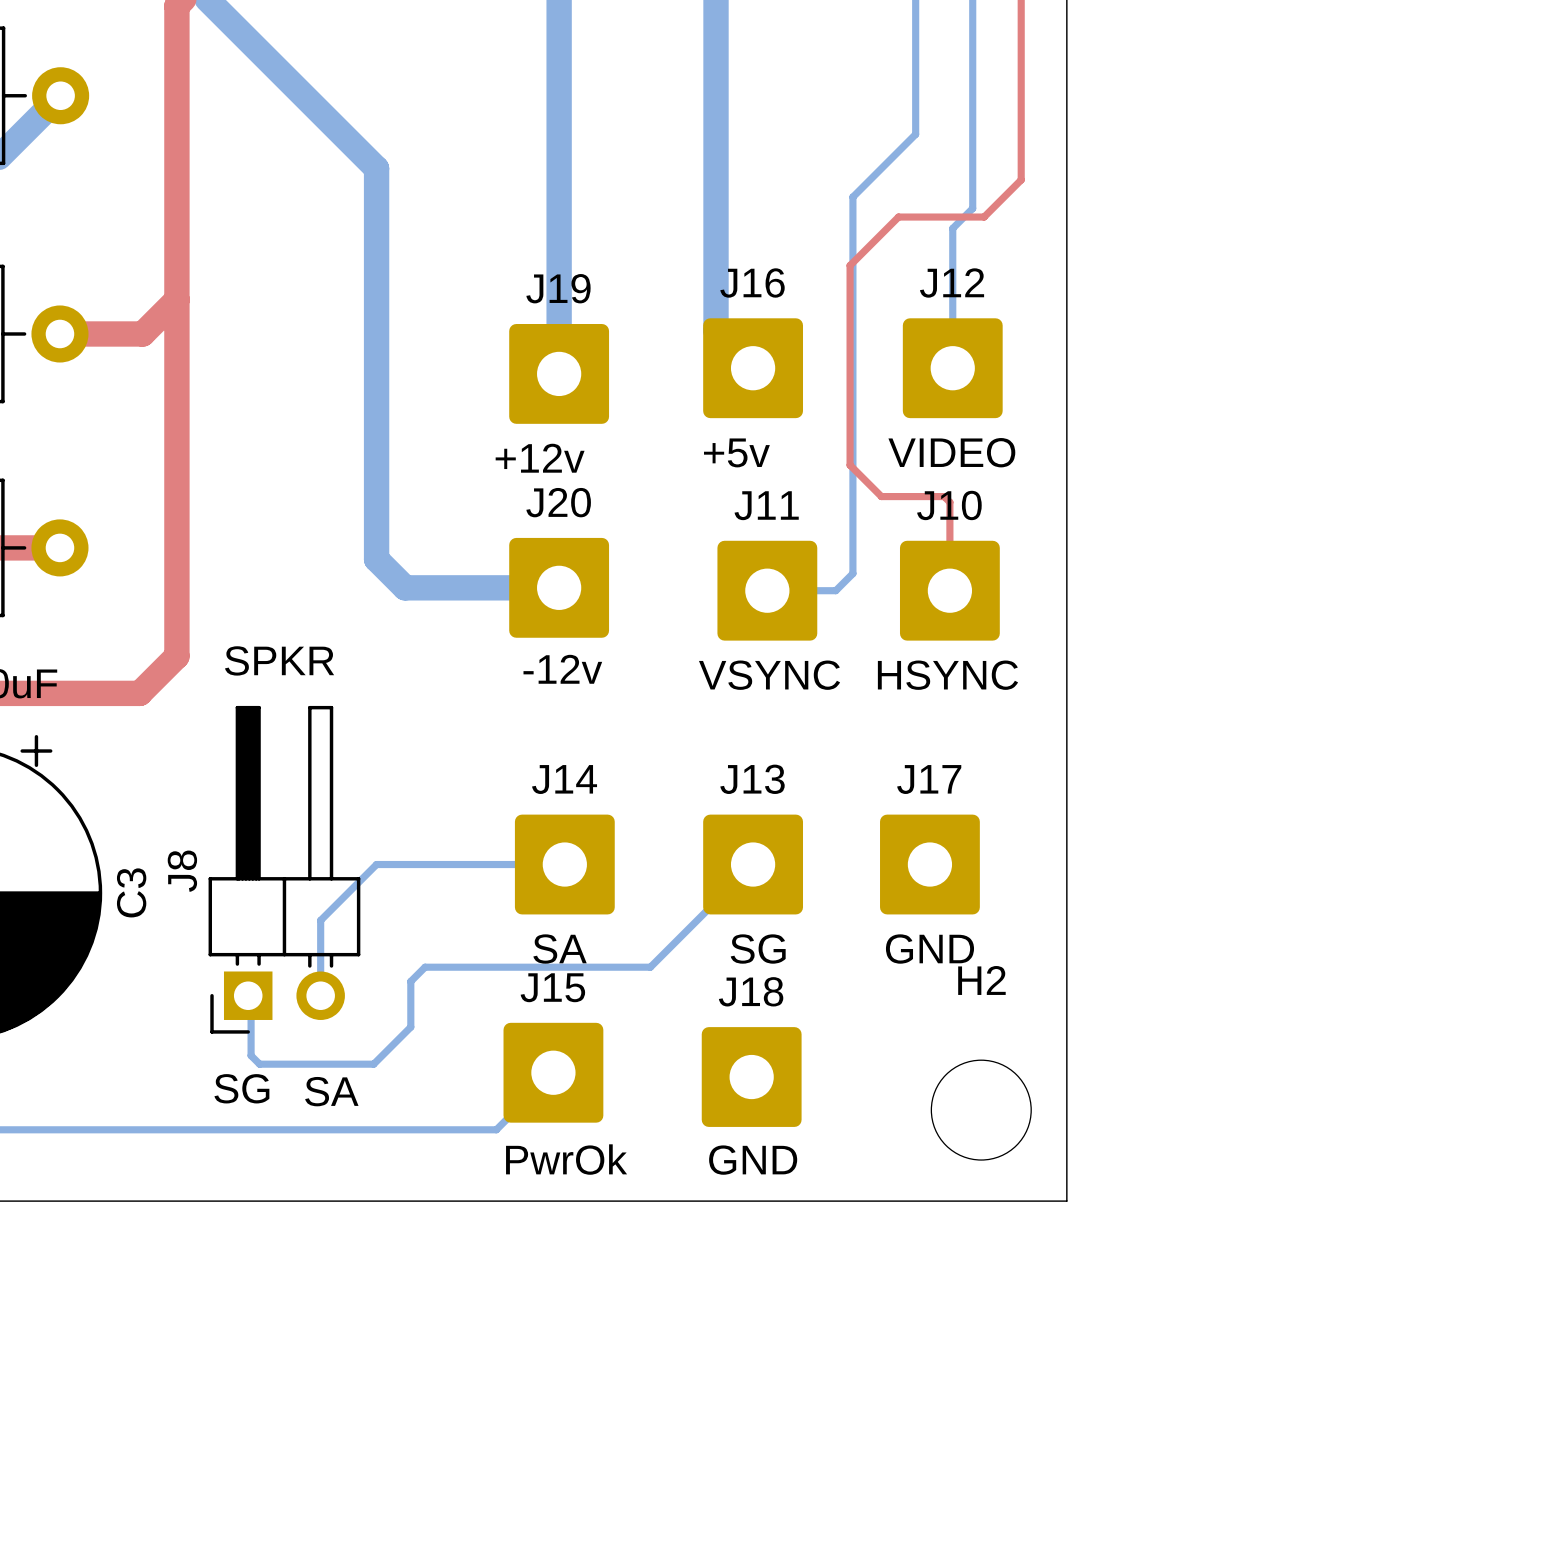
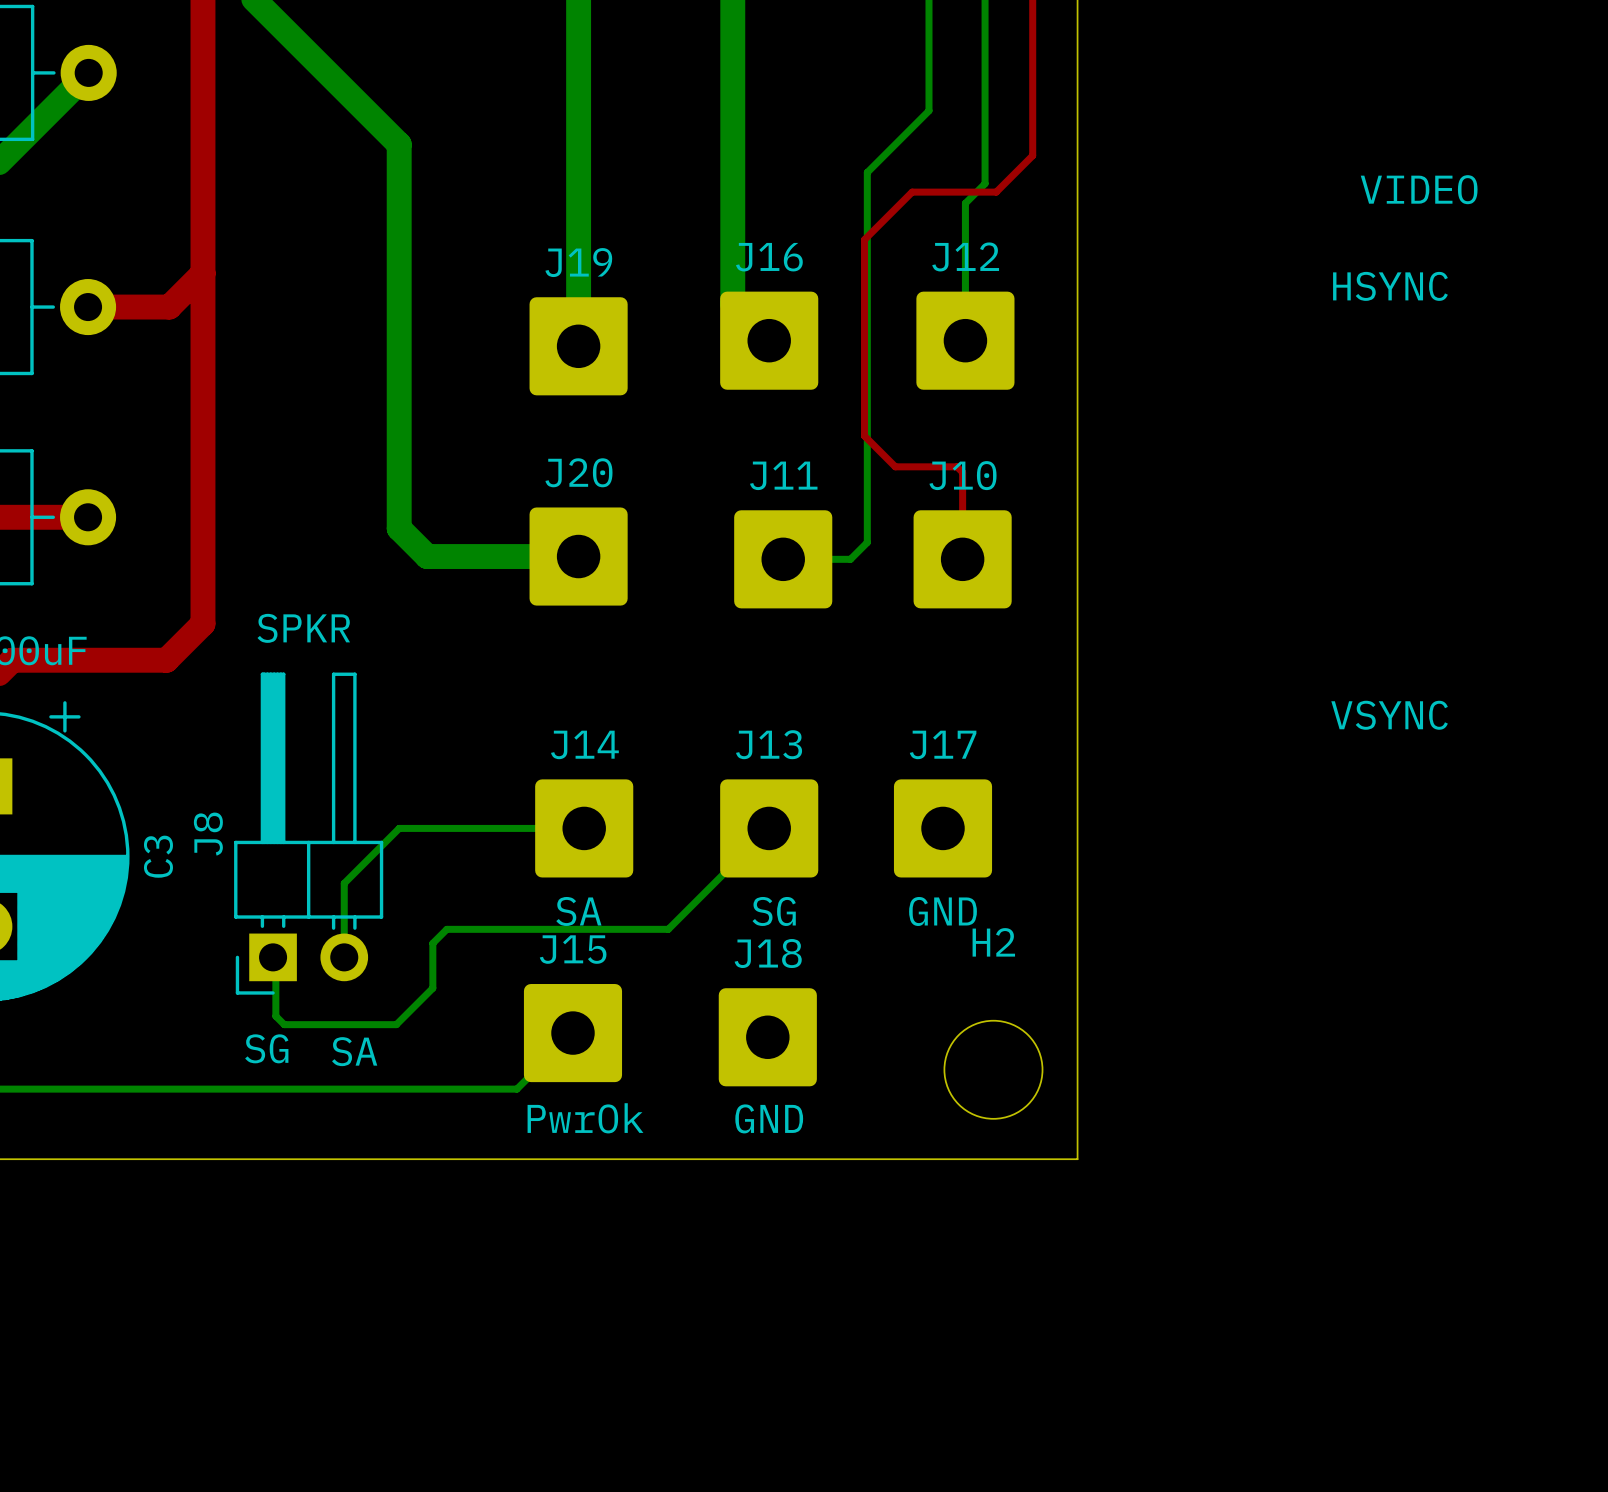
text: +5v (736, 452) -> none
text position: VIDEO (951, 452) -> VIDEO (1419, 189)
text: +12v (540, 458) -> none
text: -12v (562, 669) -> none
text position: VSYNC (769, 675) -> VSYNC (1389, 715)
text position: HSYNC (947, 675) -> HSYNC (1390, 286)

